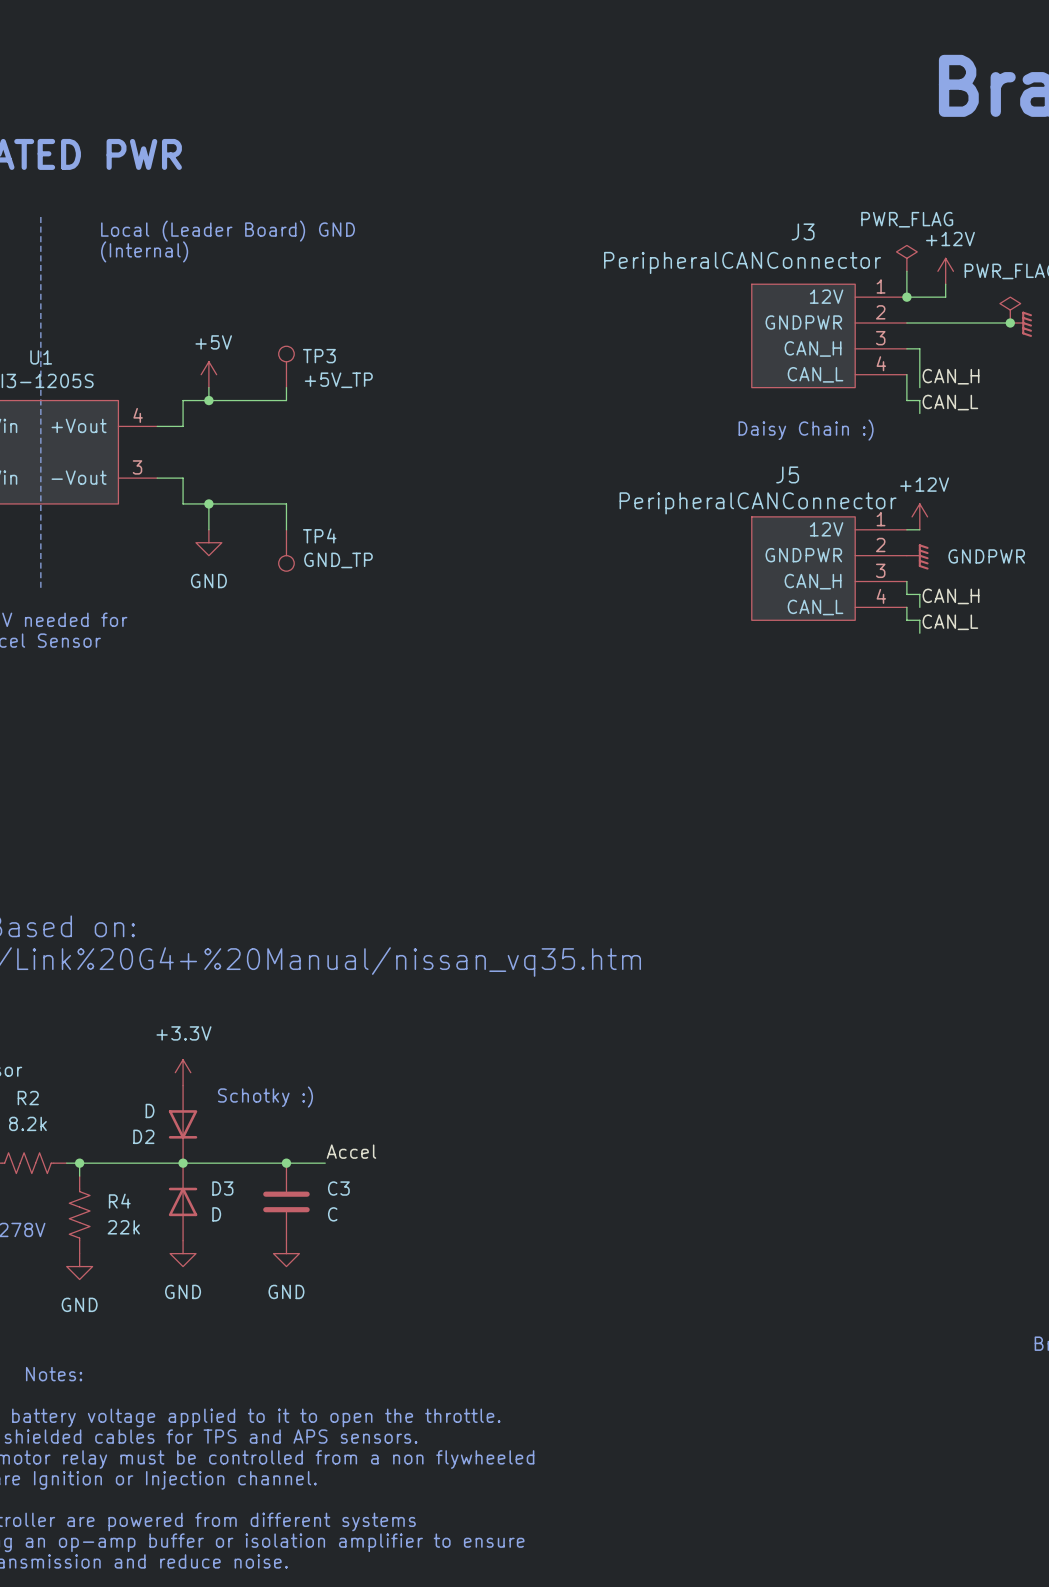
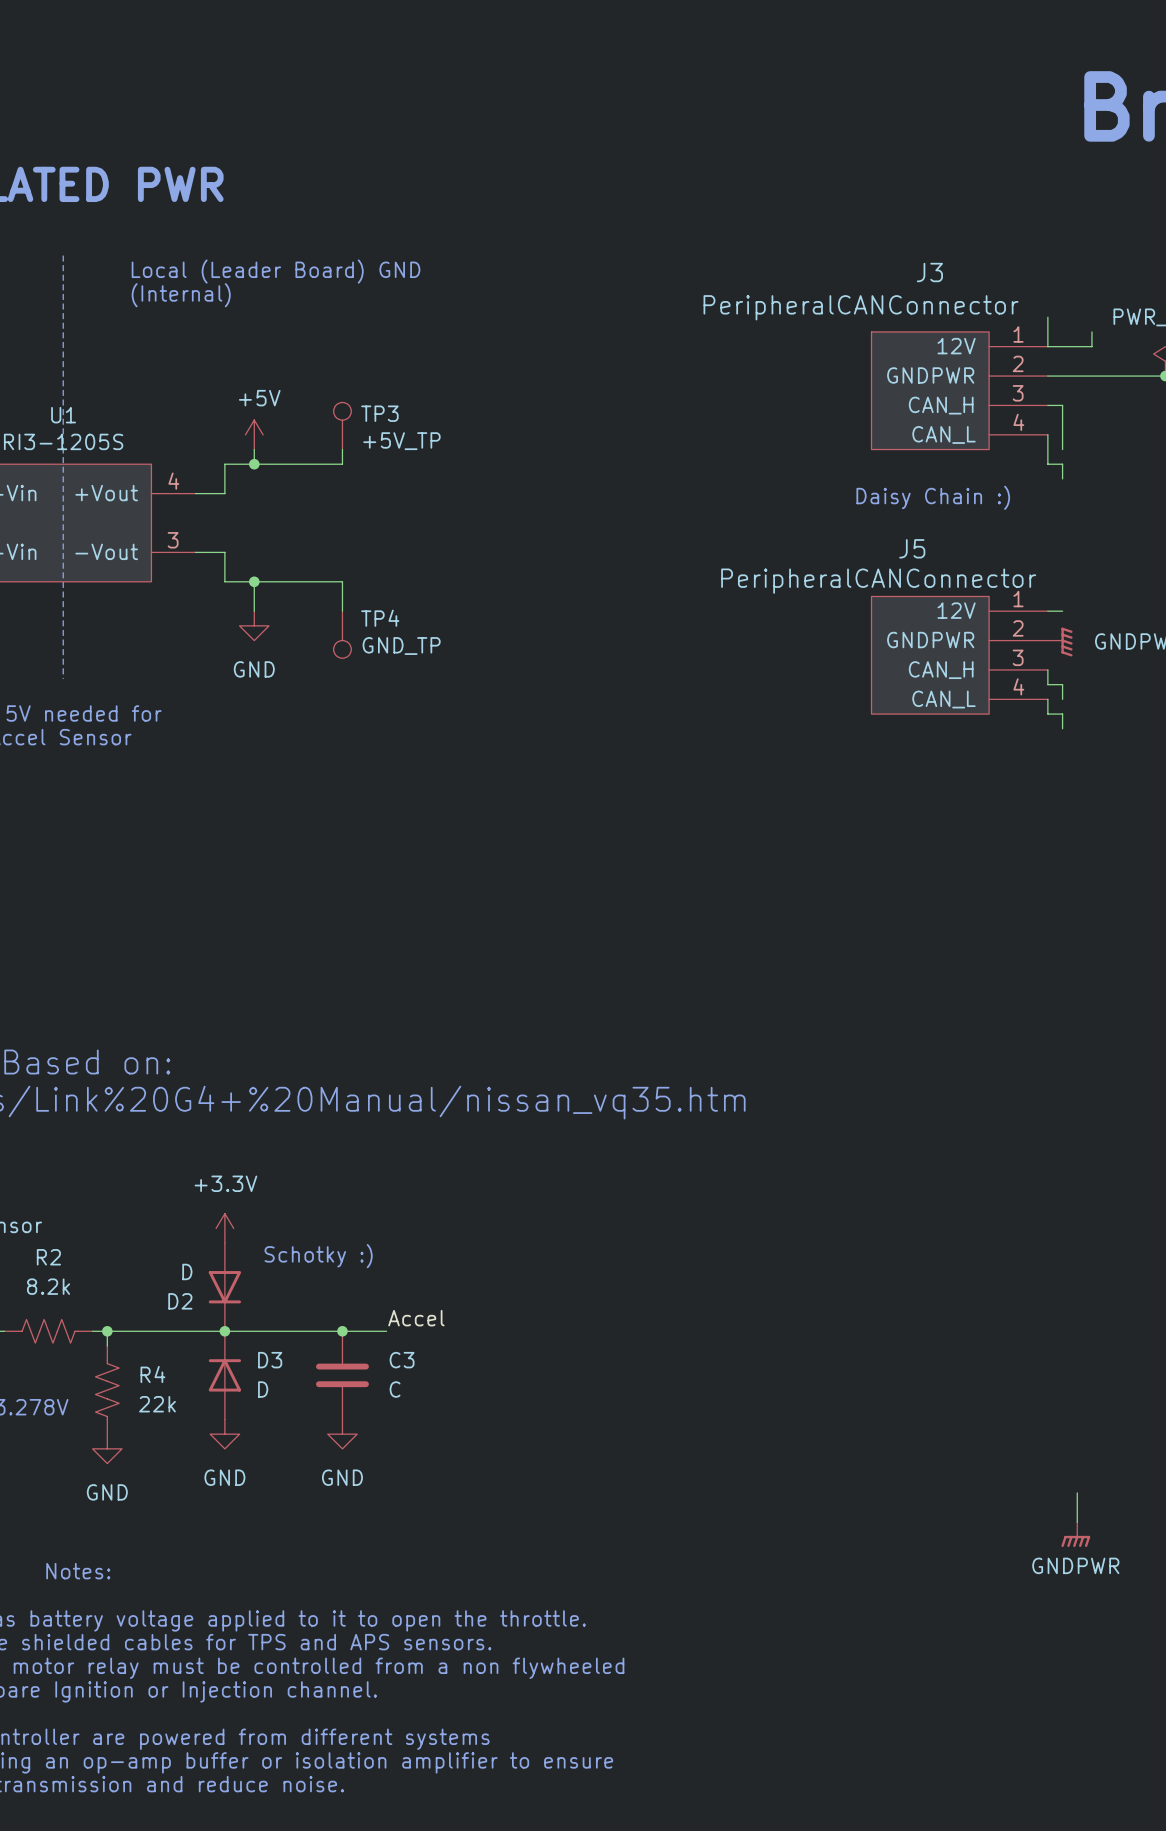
power symbol: PWR_FLAG (906, 258) -> none
power symbol: +12V (945, 271) -> none
junction: (906, 297) -> none
label: CAN_H (951, 376) -> none
label: CAN_L (950, 402) -> none
power symbol: +12V (919, 516) -> none
label: CAN_H (951, 596) -> none
label: CAN_L (950, 622) -> none
wire: none -> (1077, 1492) (1077, 1522)
power symbol: none -> GNDPWR (1075, 1534)

